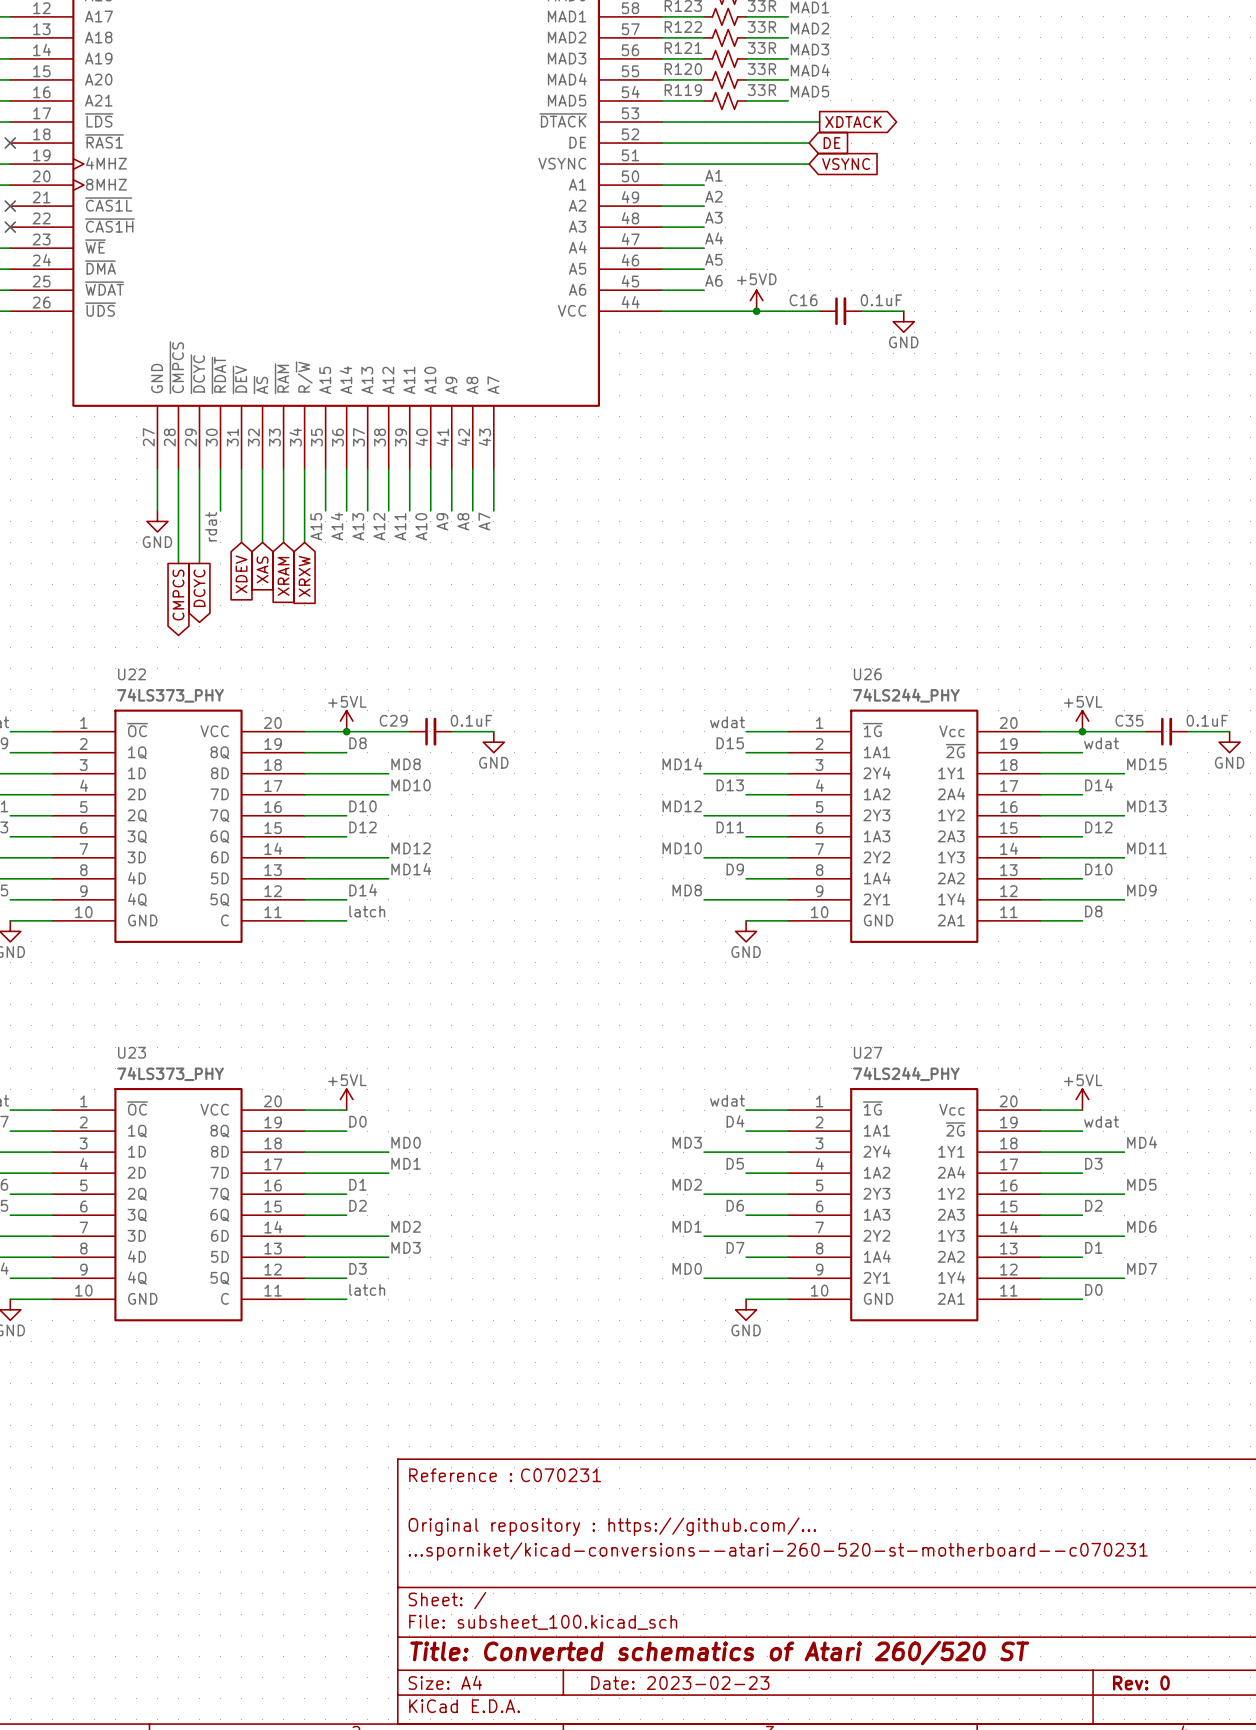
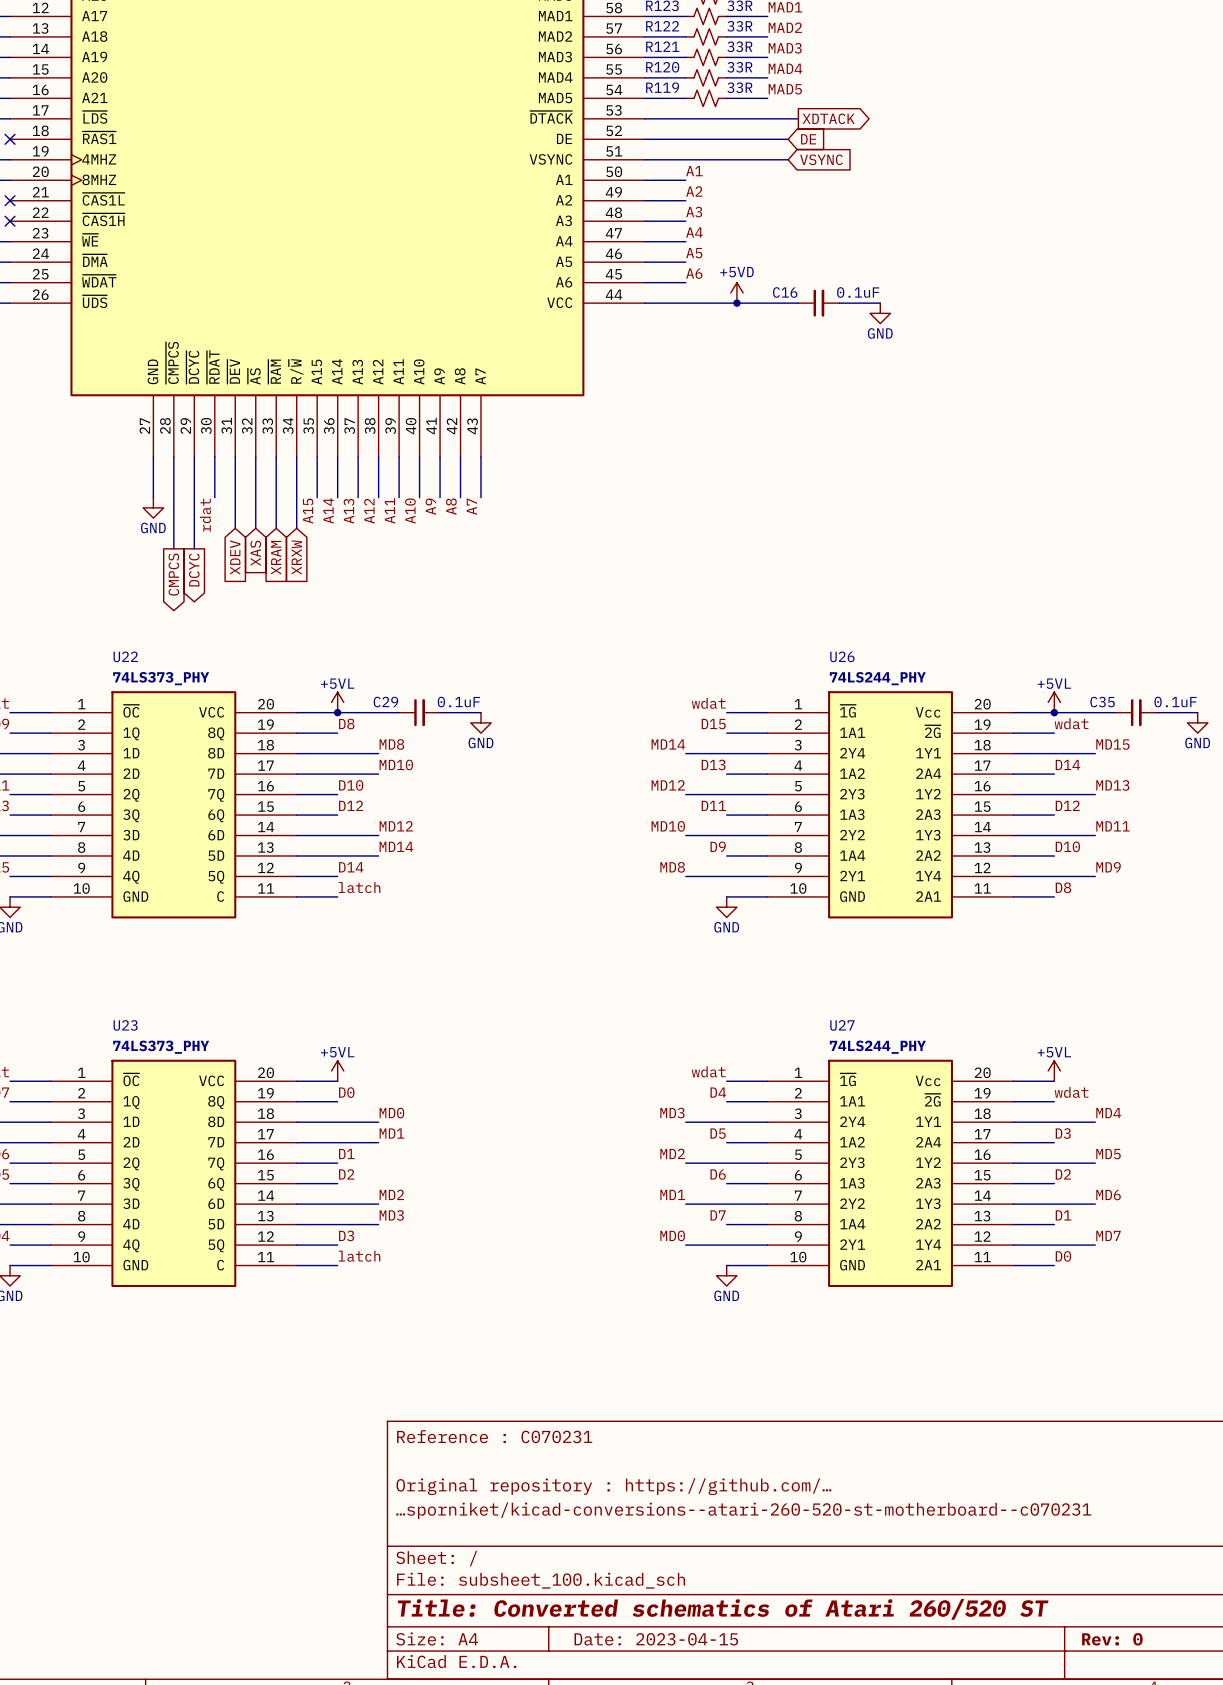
title block: Date: 2023-02-23 (680, 1683) -> Date: 2023-04-15 (656, 1639)

